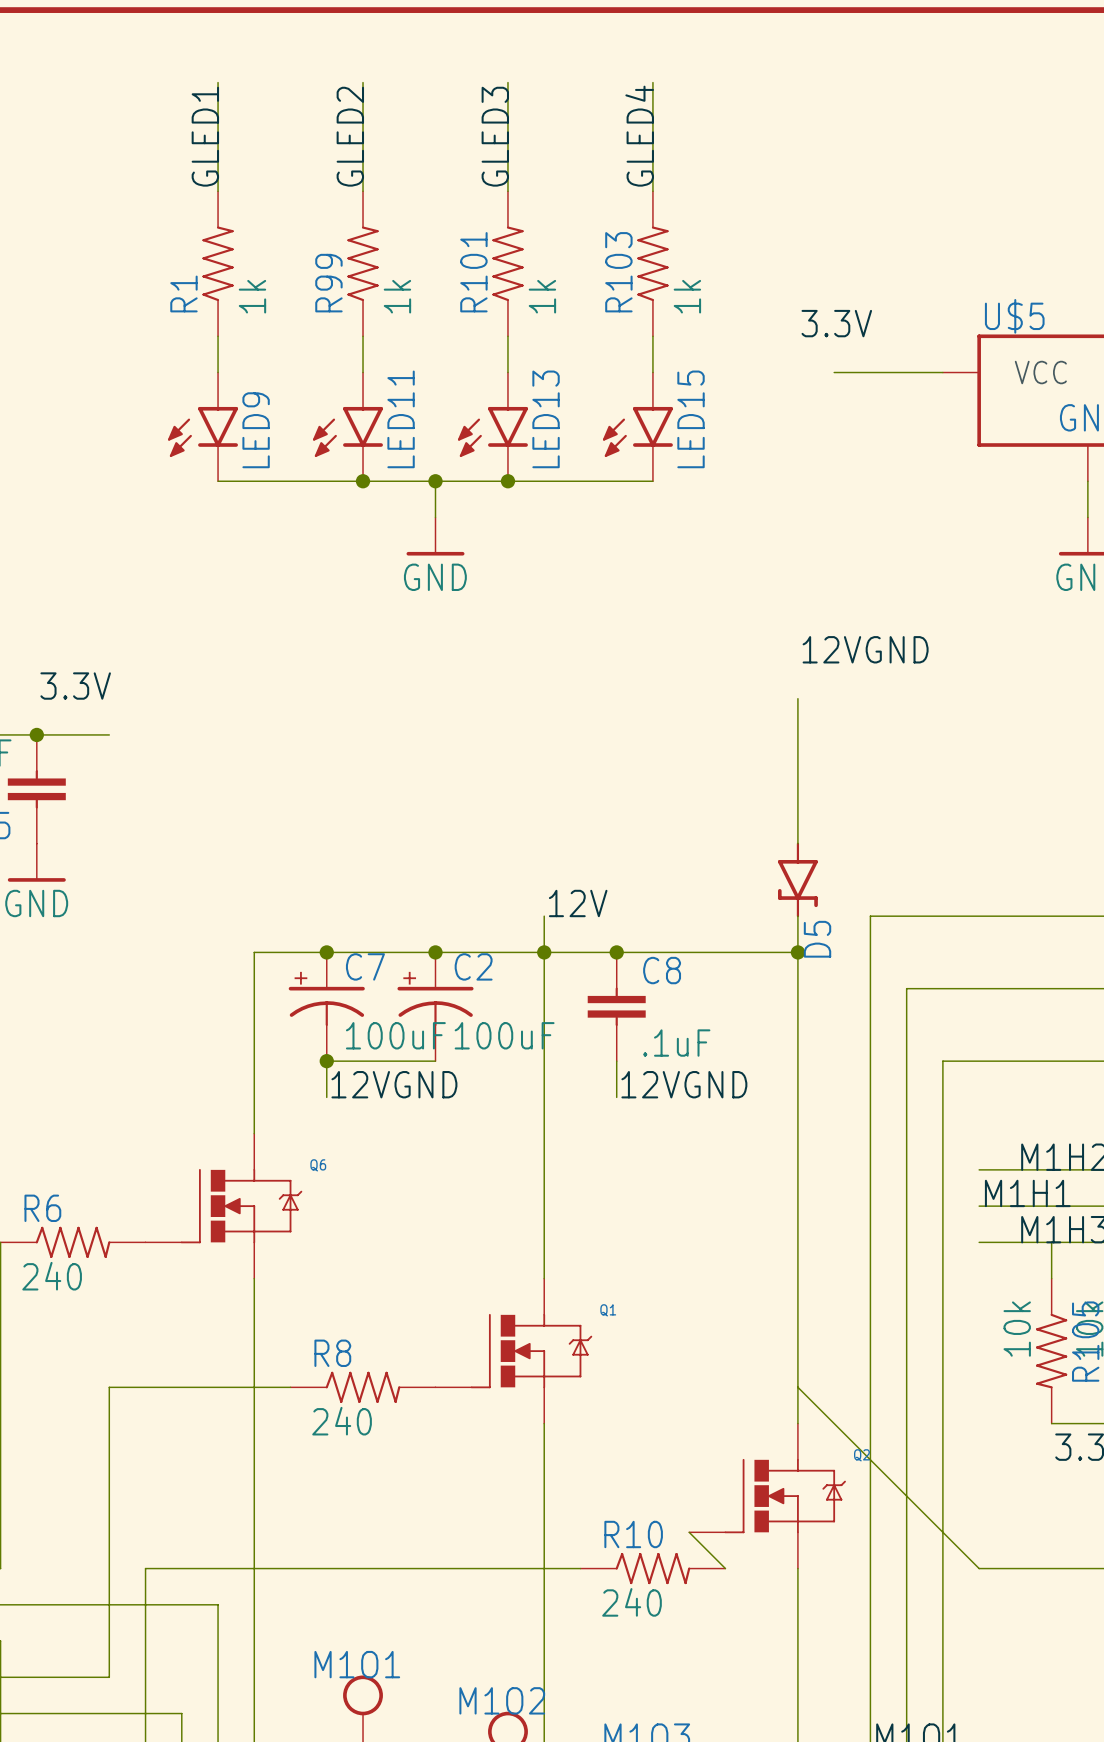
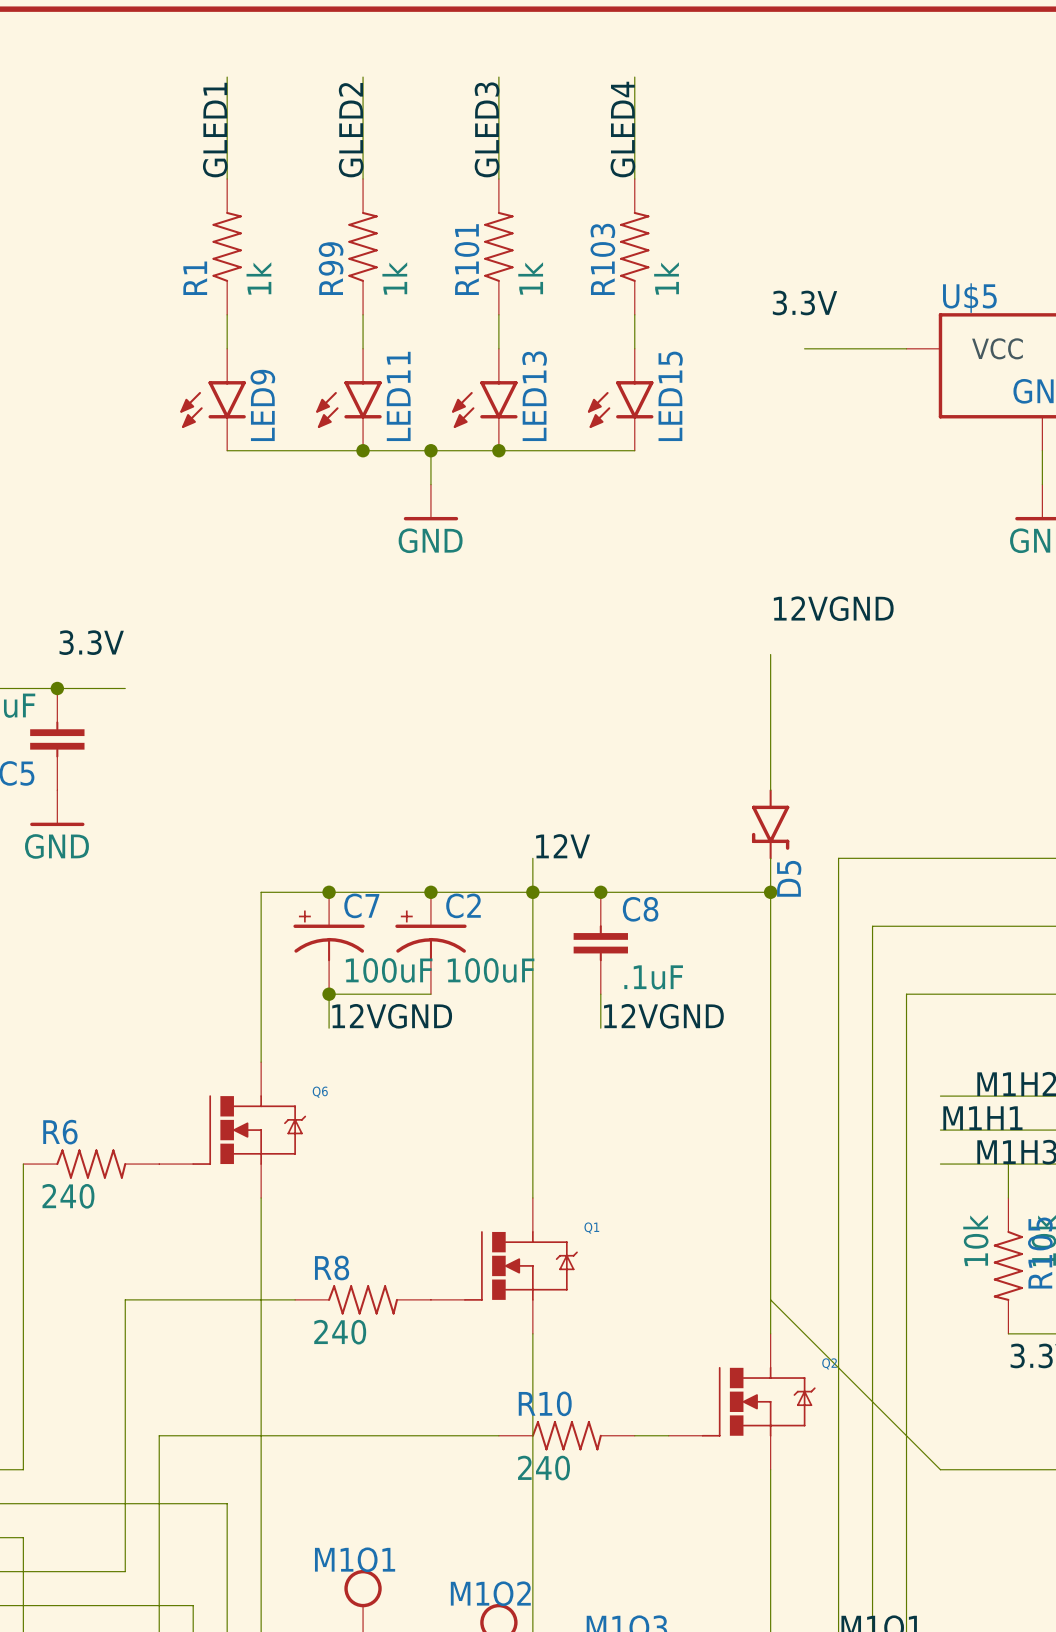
wire: (689, 1532) (725, 1568) -> (668, 1435) (634, 1435)
wire: (145, 1568) (580, 1568) -> (159, 1469) (159, 1435) (498, 1435)
R10 position: (652, 1568) -> (566, 1435)

